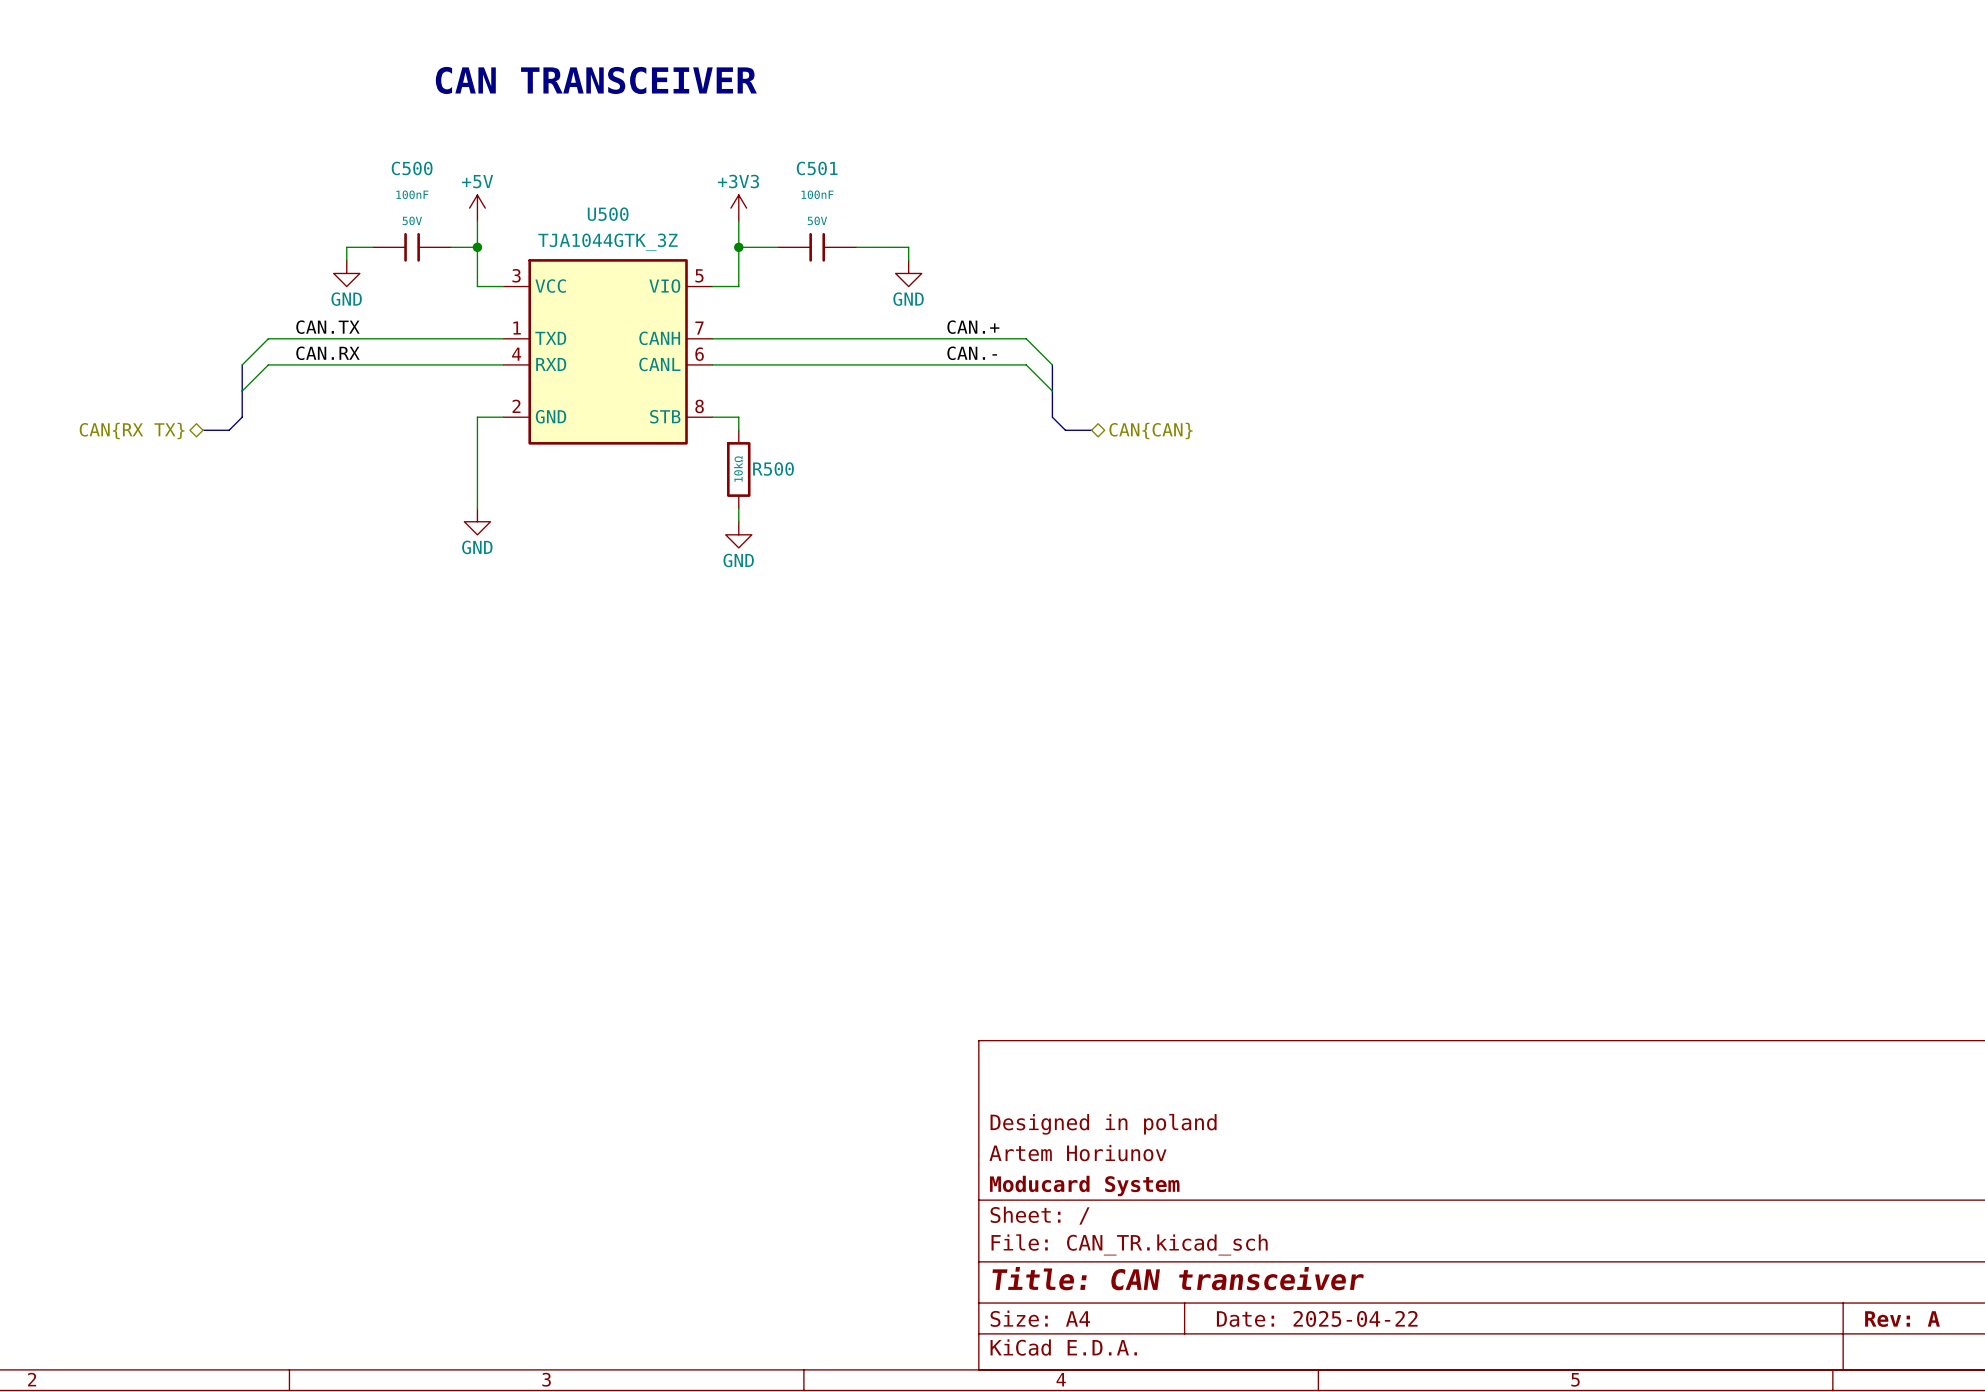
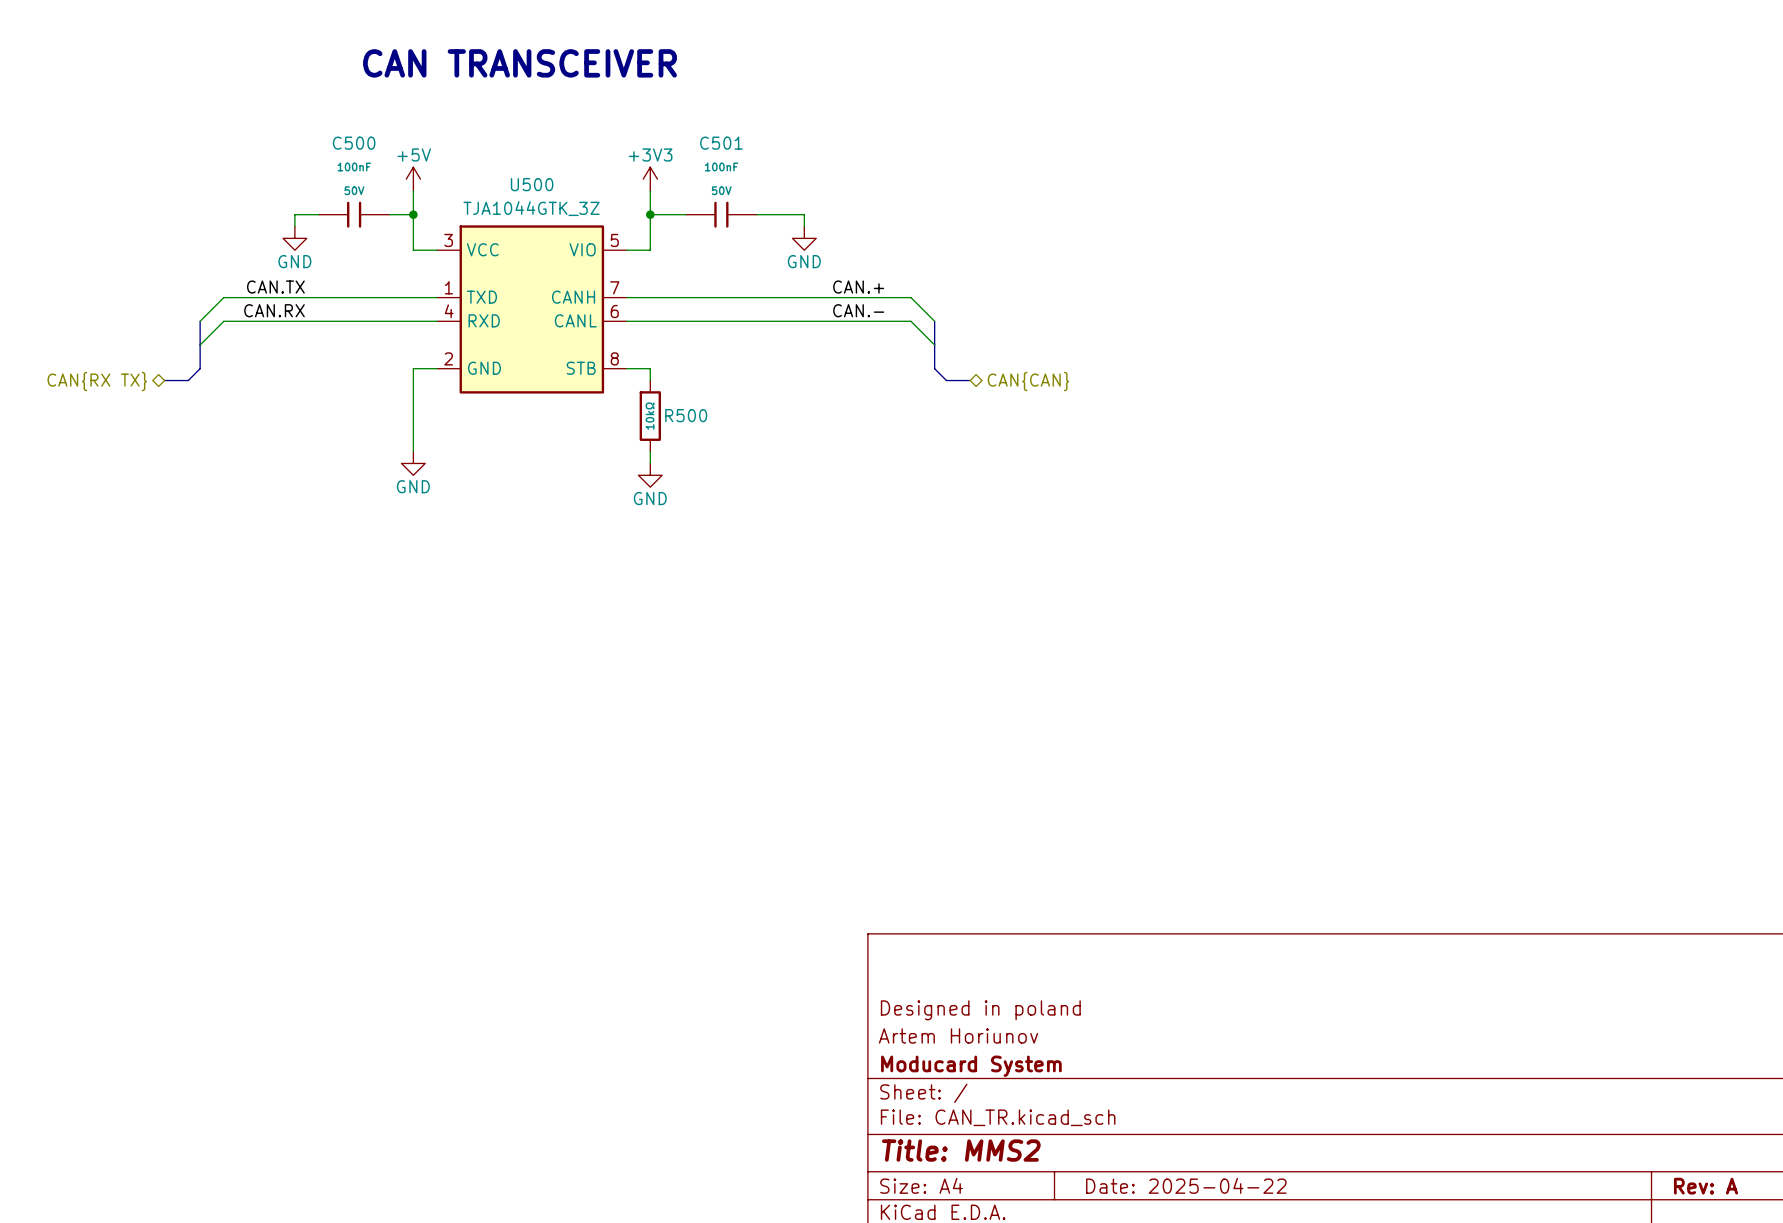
title block: Title: CAN transceiver (1178, 1278) -> Title: MMS2 (961, 1150)

